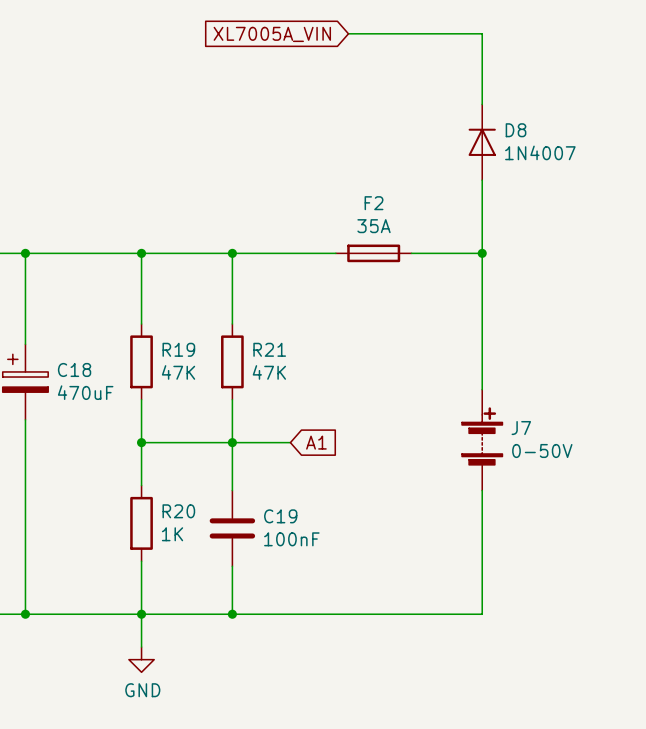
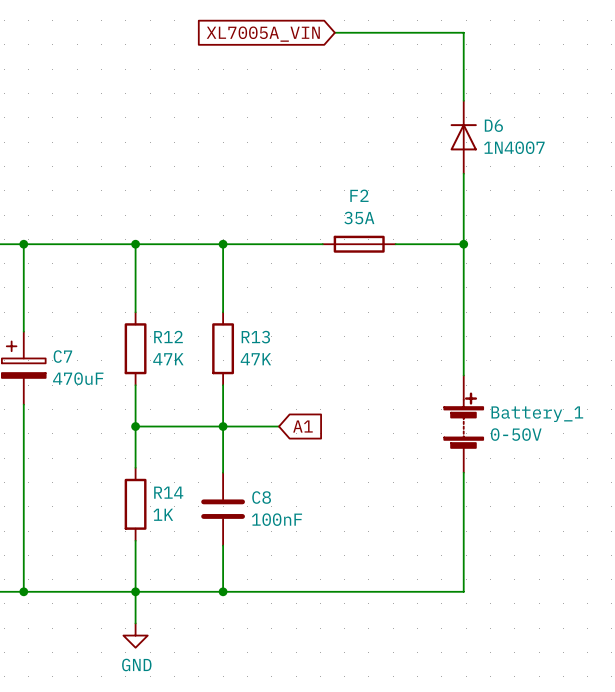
D8 name: D8 (516, 130) -> D6 (493, 125)
R19 name: R19 (178, 349) -> R12 (168, 337)
R21 name: R21 (269, 349) -> R13 (255, 337)
C18 name: C18 (74, 369) -> C7 (62, 356)
J7 name: J7 (521, 428) -> Battery_1 (537, 414)
R20 name: R20 (178, 511) -> R14 (168, 492)
C19 name: C19 (280, 516) -> C8 (261, 497)

